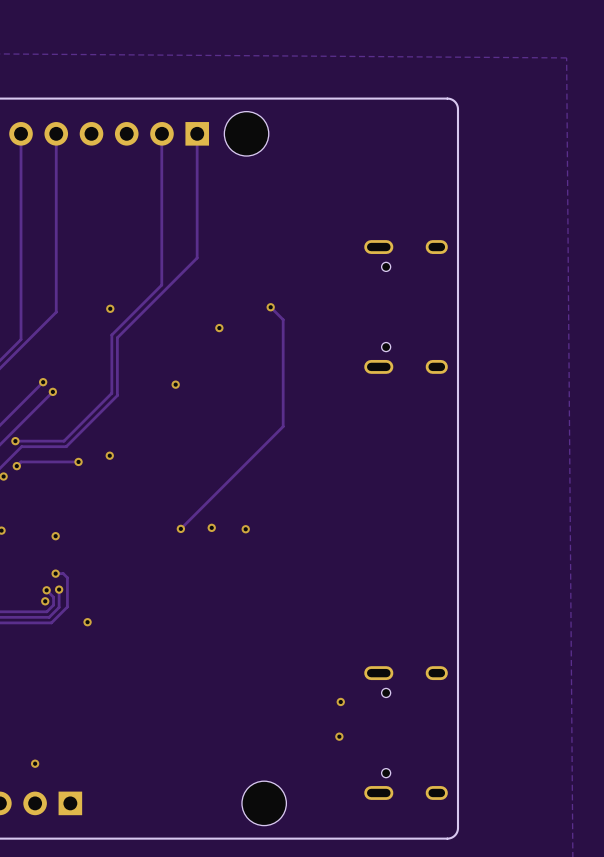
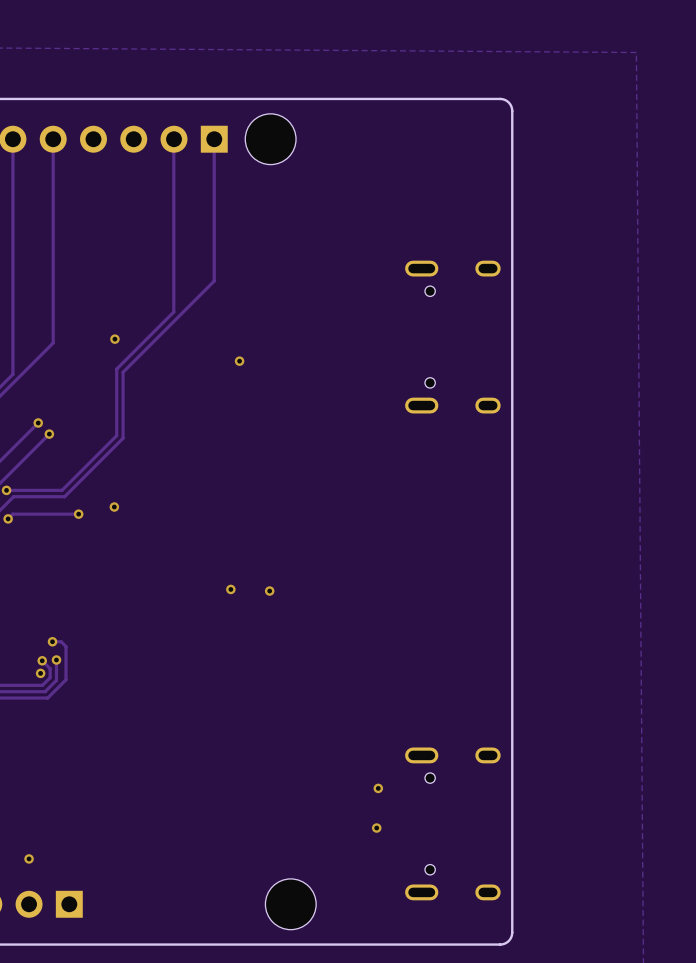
track: (270, 307) (283, 319) (283, 426) (181, 527) -> none
via: (270, 307) -> none
via: (175, 384) -> none
via: (180, 528) -> none
via: (55, 536) -> none
via: (87, 622) -> none

